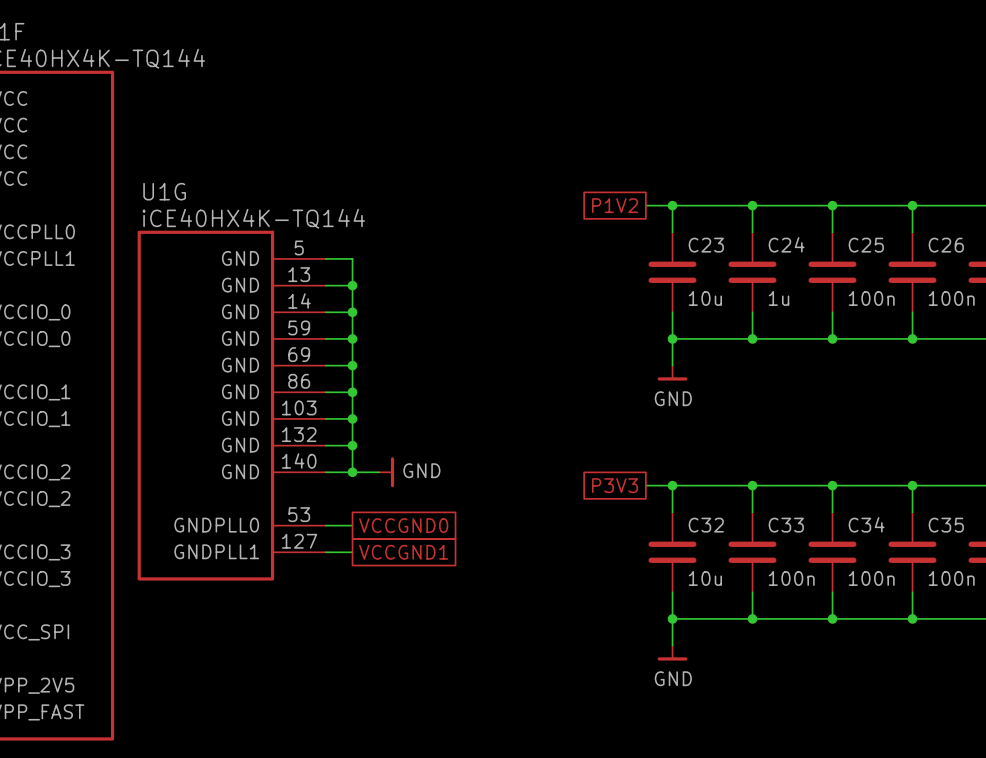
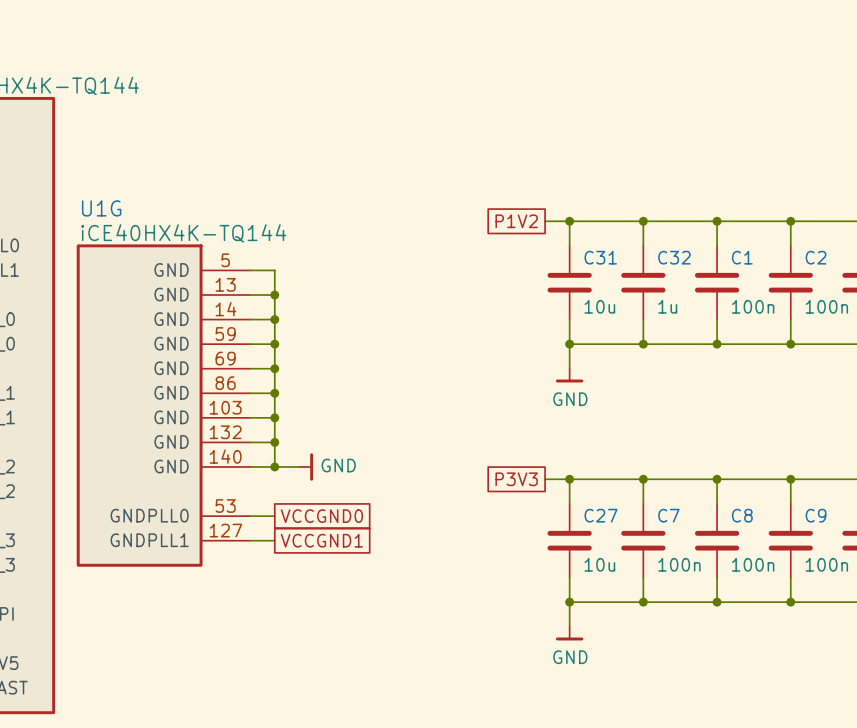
C24 name: C24 (786, 244) -> C32 (674, 257)
C23 name: C23 (706, 245) -> C31 (600, 257)
C25 name: C25 (866, 245) -> C1 (742, 257)
C26 name: C26 (946, 245) -> C2 (816, 257)
C34 name: C34 (866, 524) -> C8 (742, 515)
C32 name: C32 (706, 525) -> C27 (601, 515)
C33 name: C33 (786, 525) -> C7 (668, 515)
C35 name: C35 (946, 525) -> C9 (816, 515)

